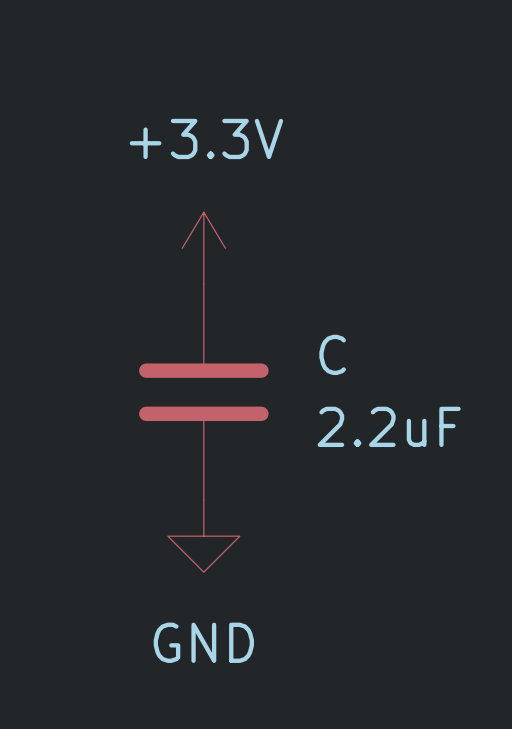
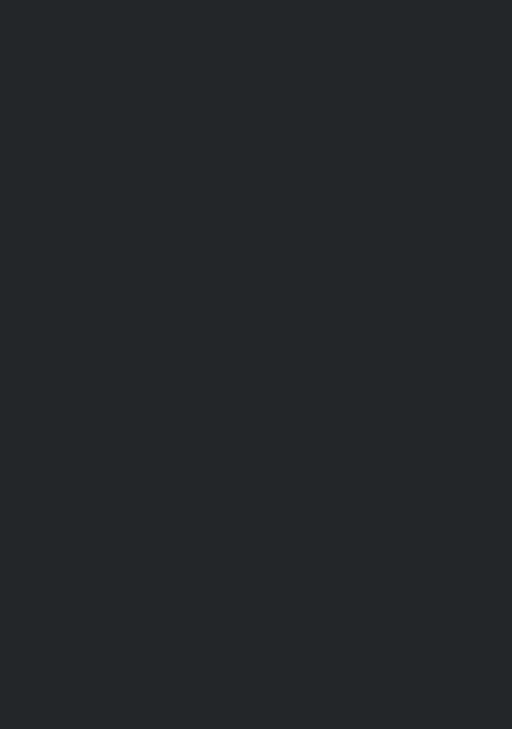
power symbol: +3.3V (203, 248) -> none
C: 2.2uF (203, 392) -> none
power symbol: GND (203, 536) -> none

